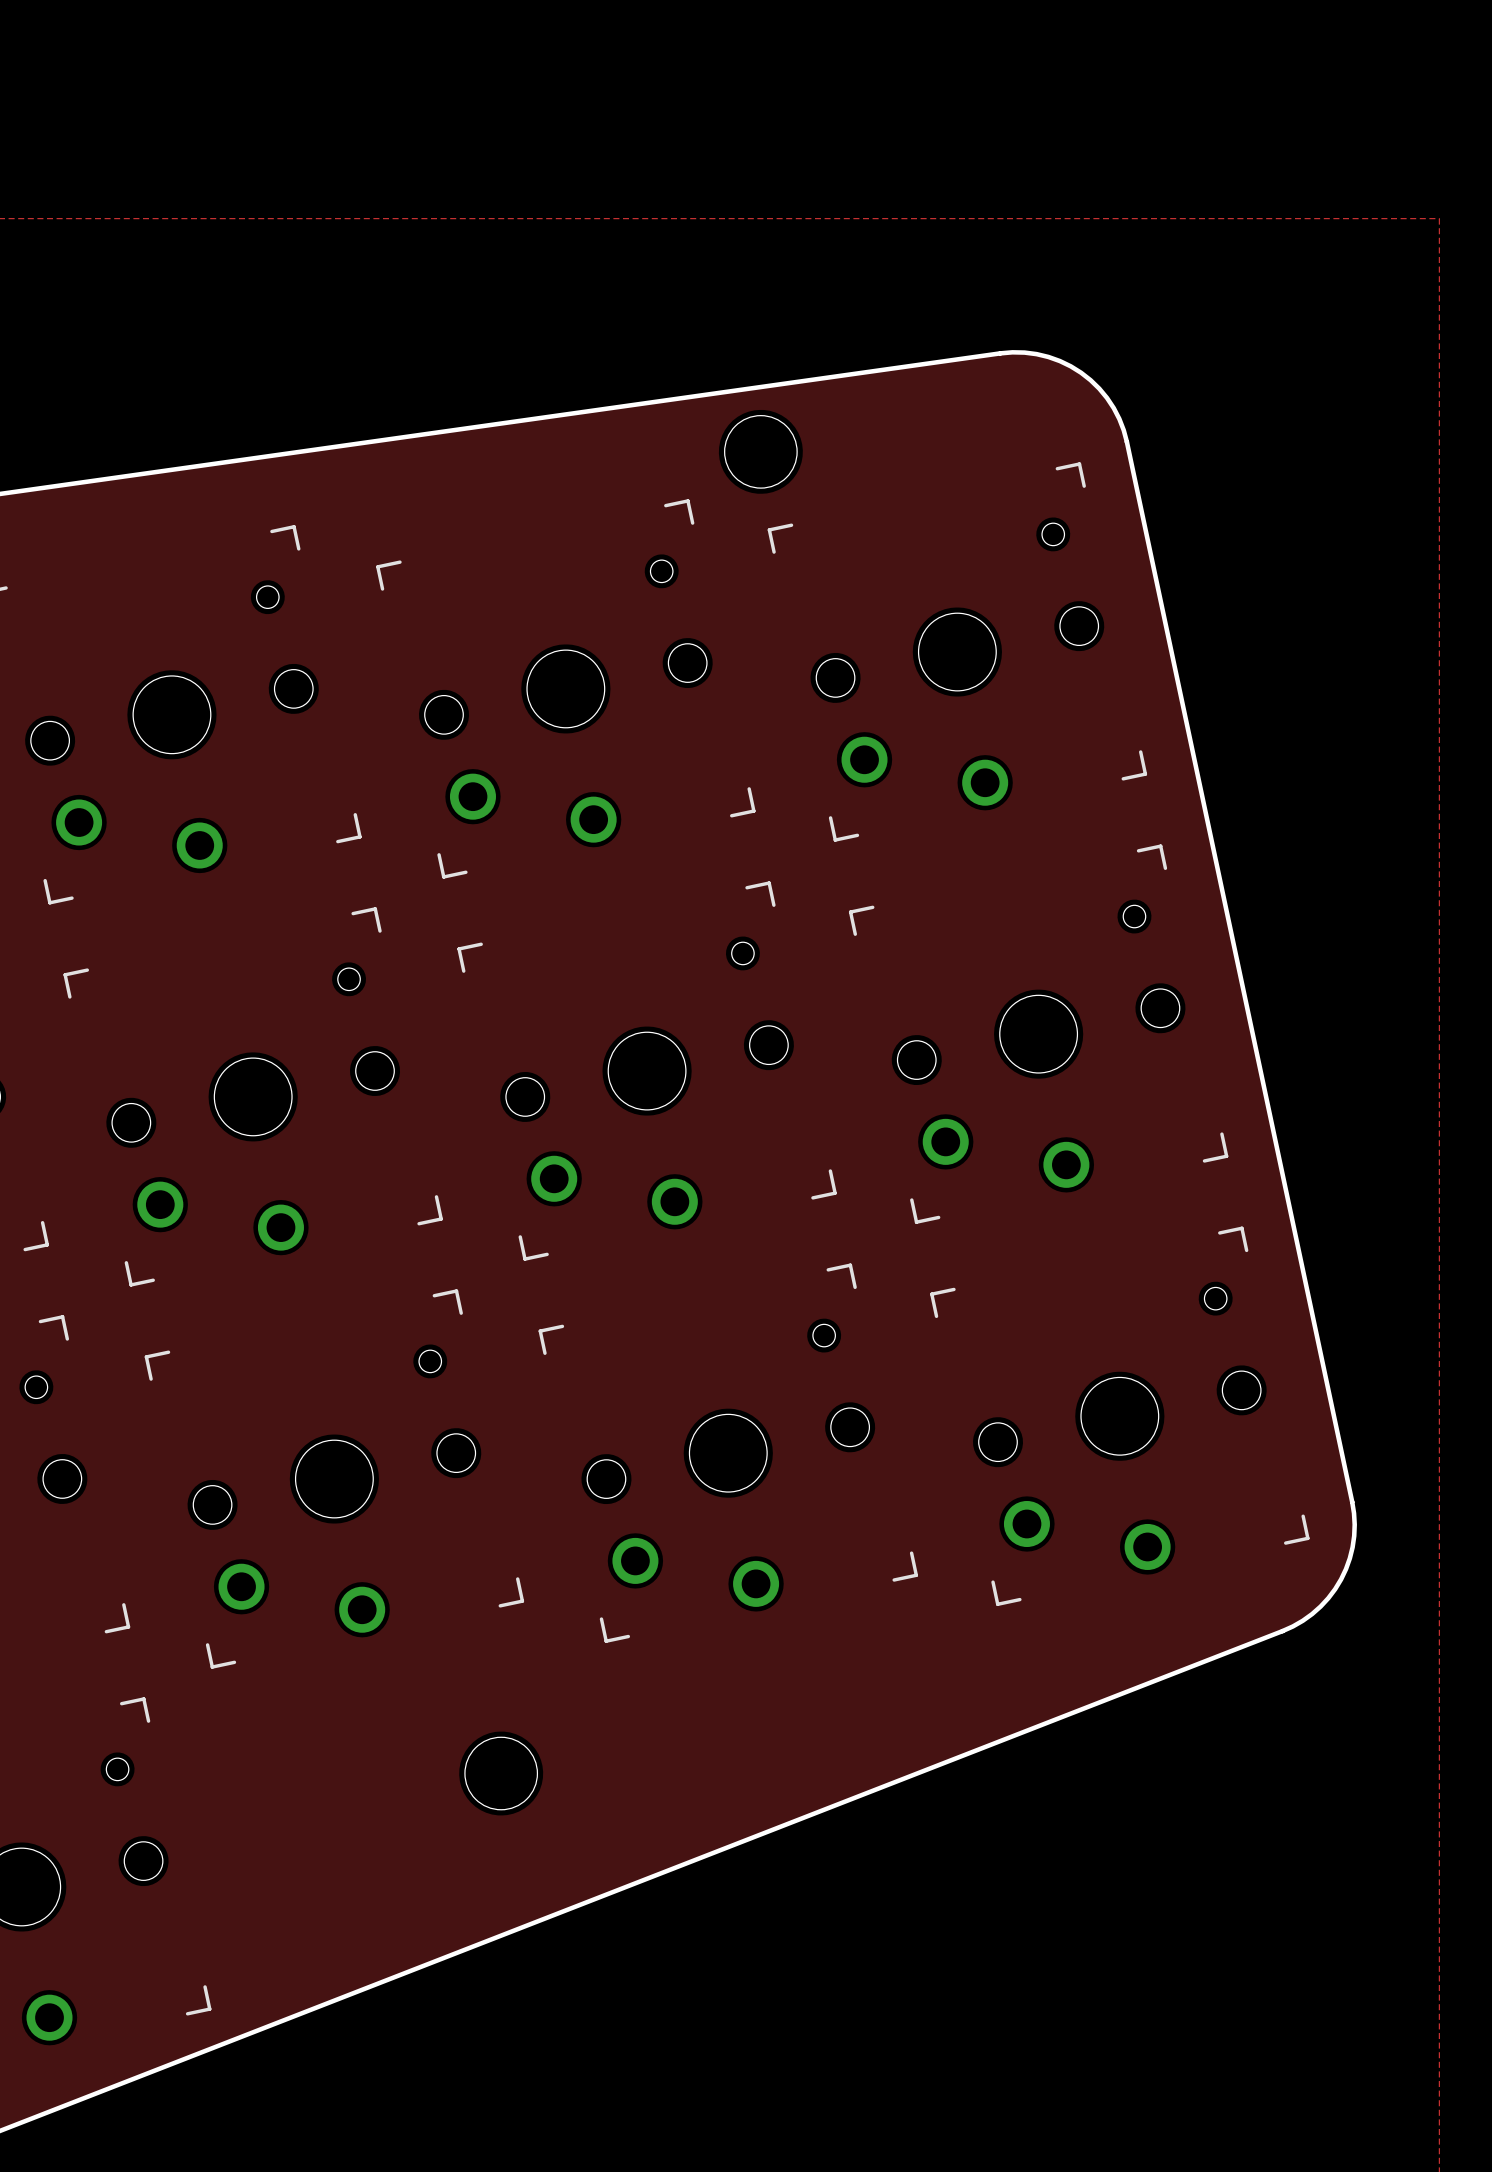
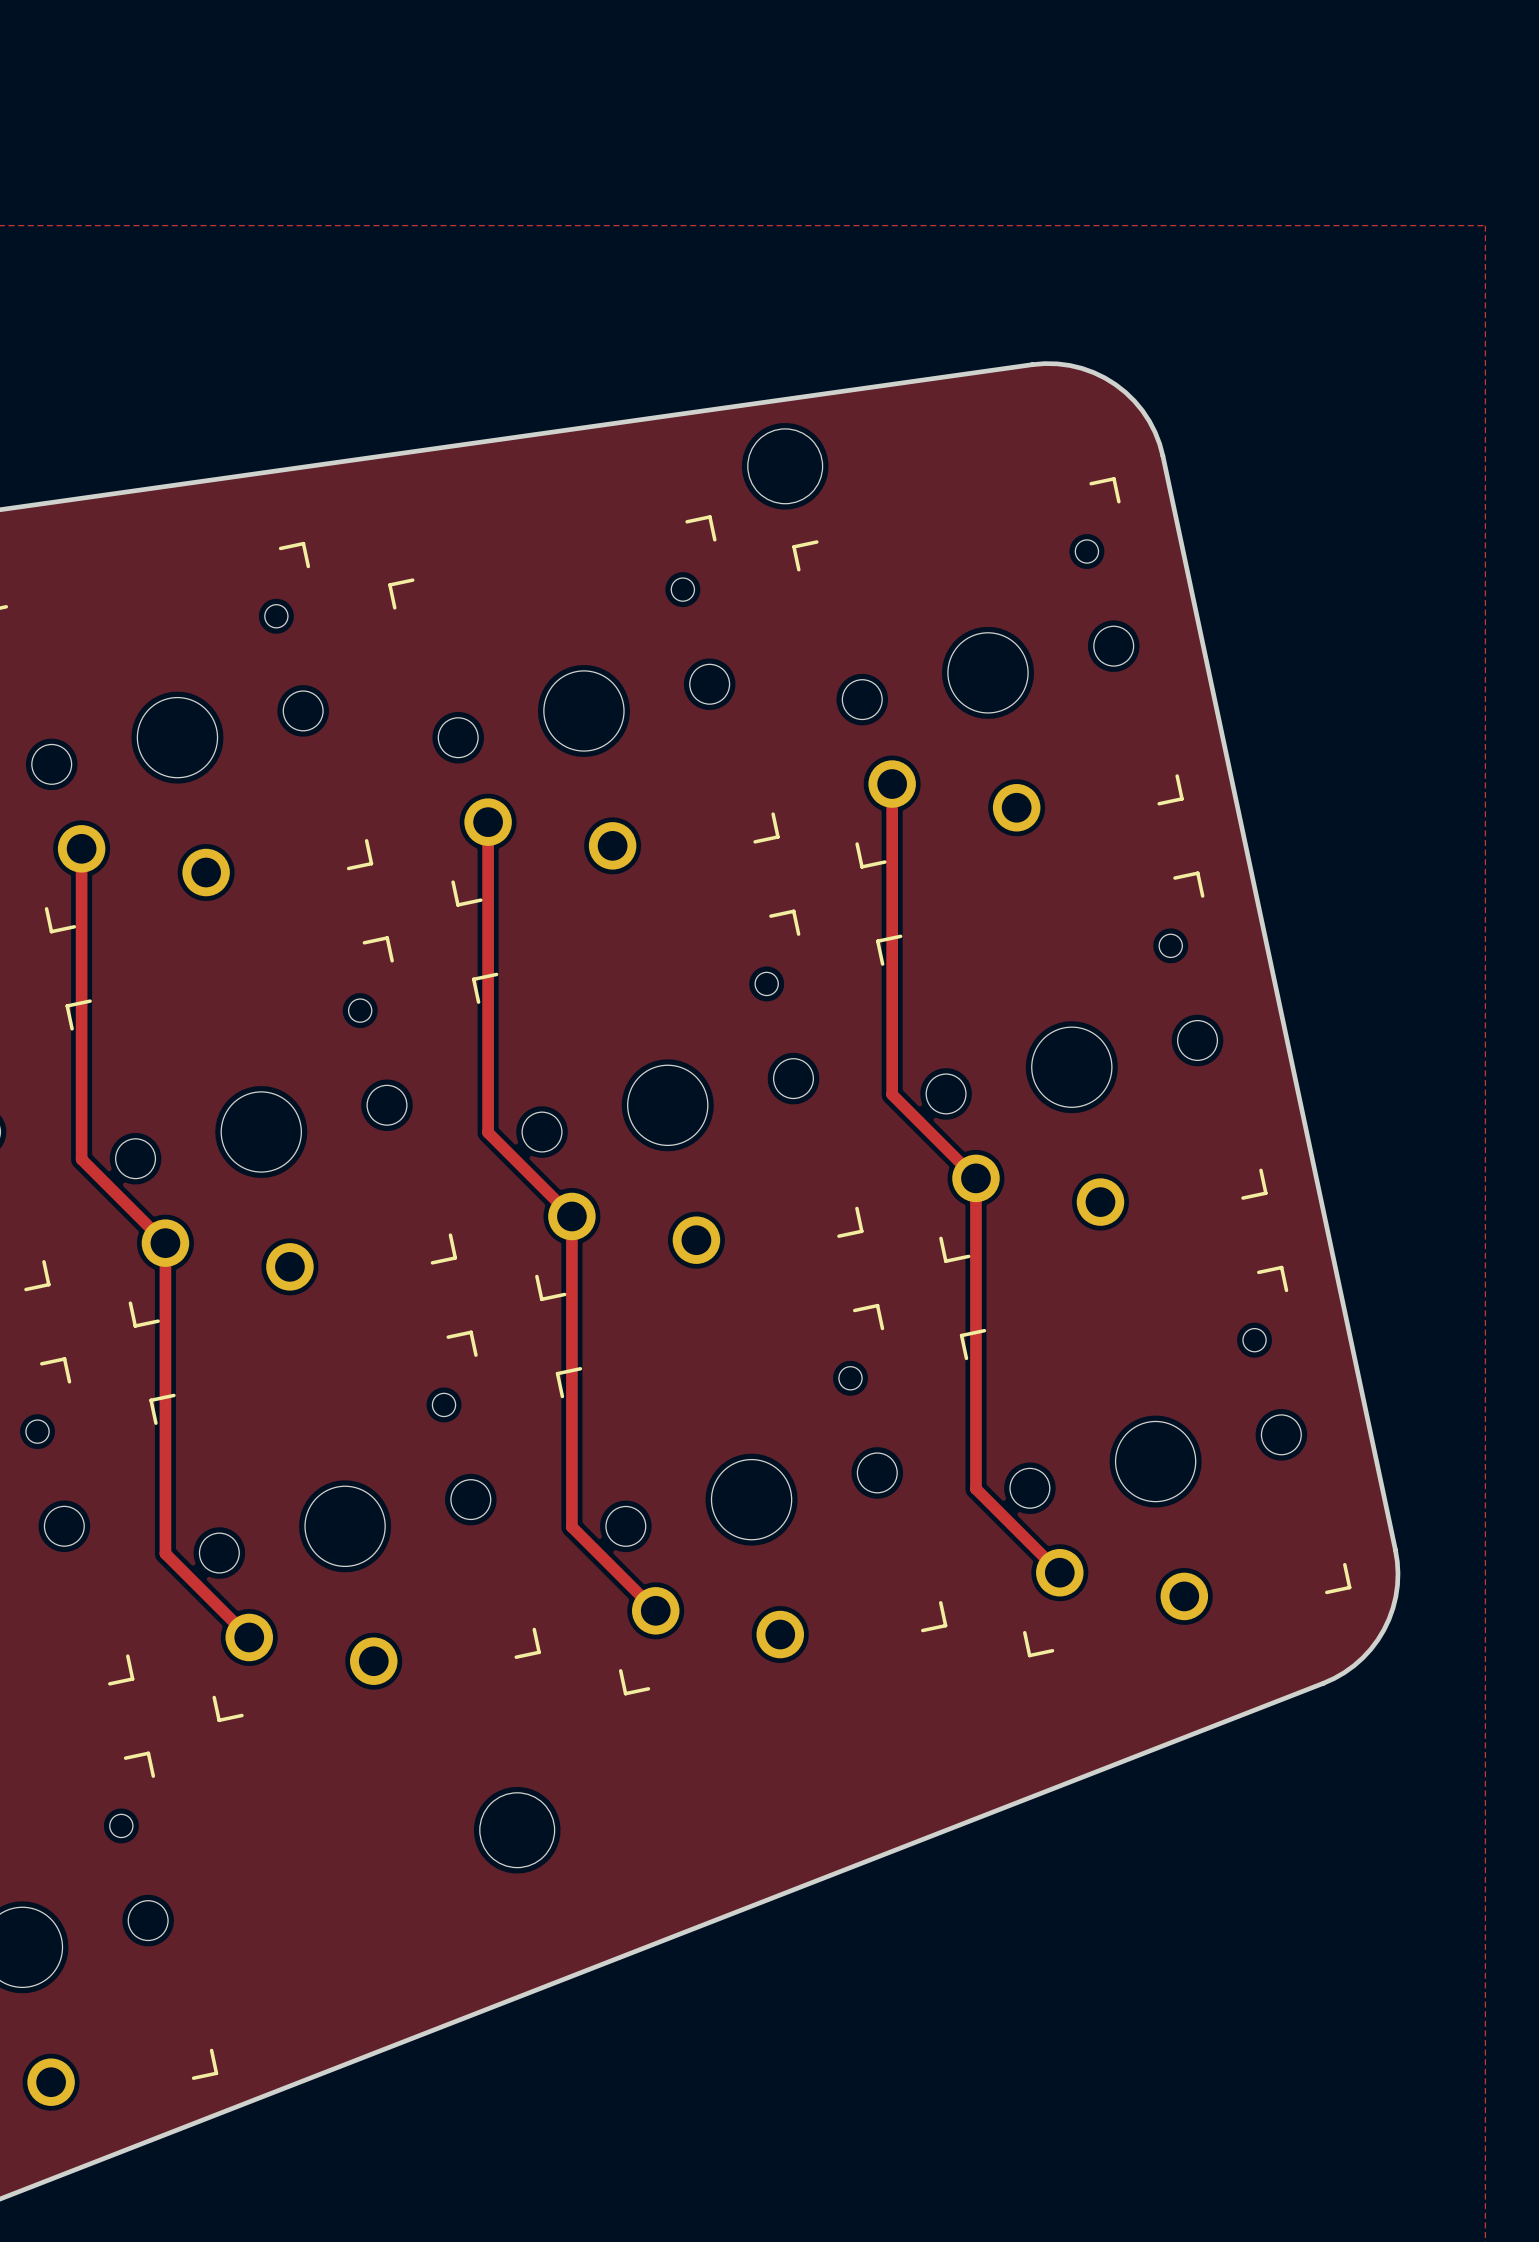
track: none -> (892, 784) (892, 1094) (975, 1178) (975, 1488) (1059, 1572)
track: none -> (488, 822) (488, 1132) (571, 1216) (571, 1526) (655, 1610)
track: none -> (81, 848) (81, 1159) (165, 1243) (165, 1553) (249, 1637)

